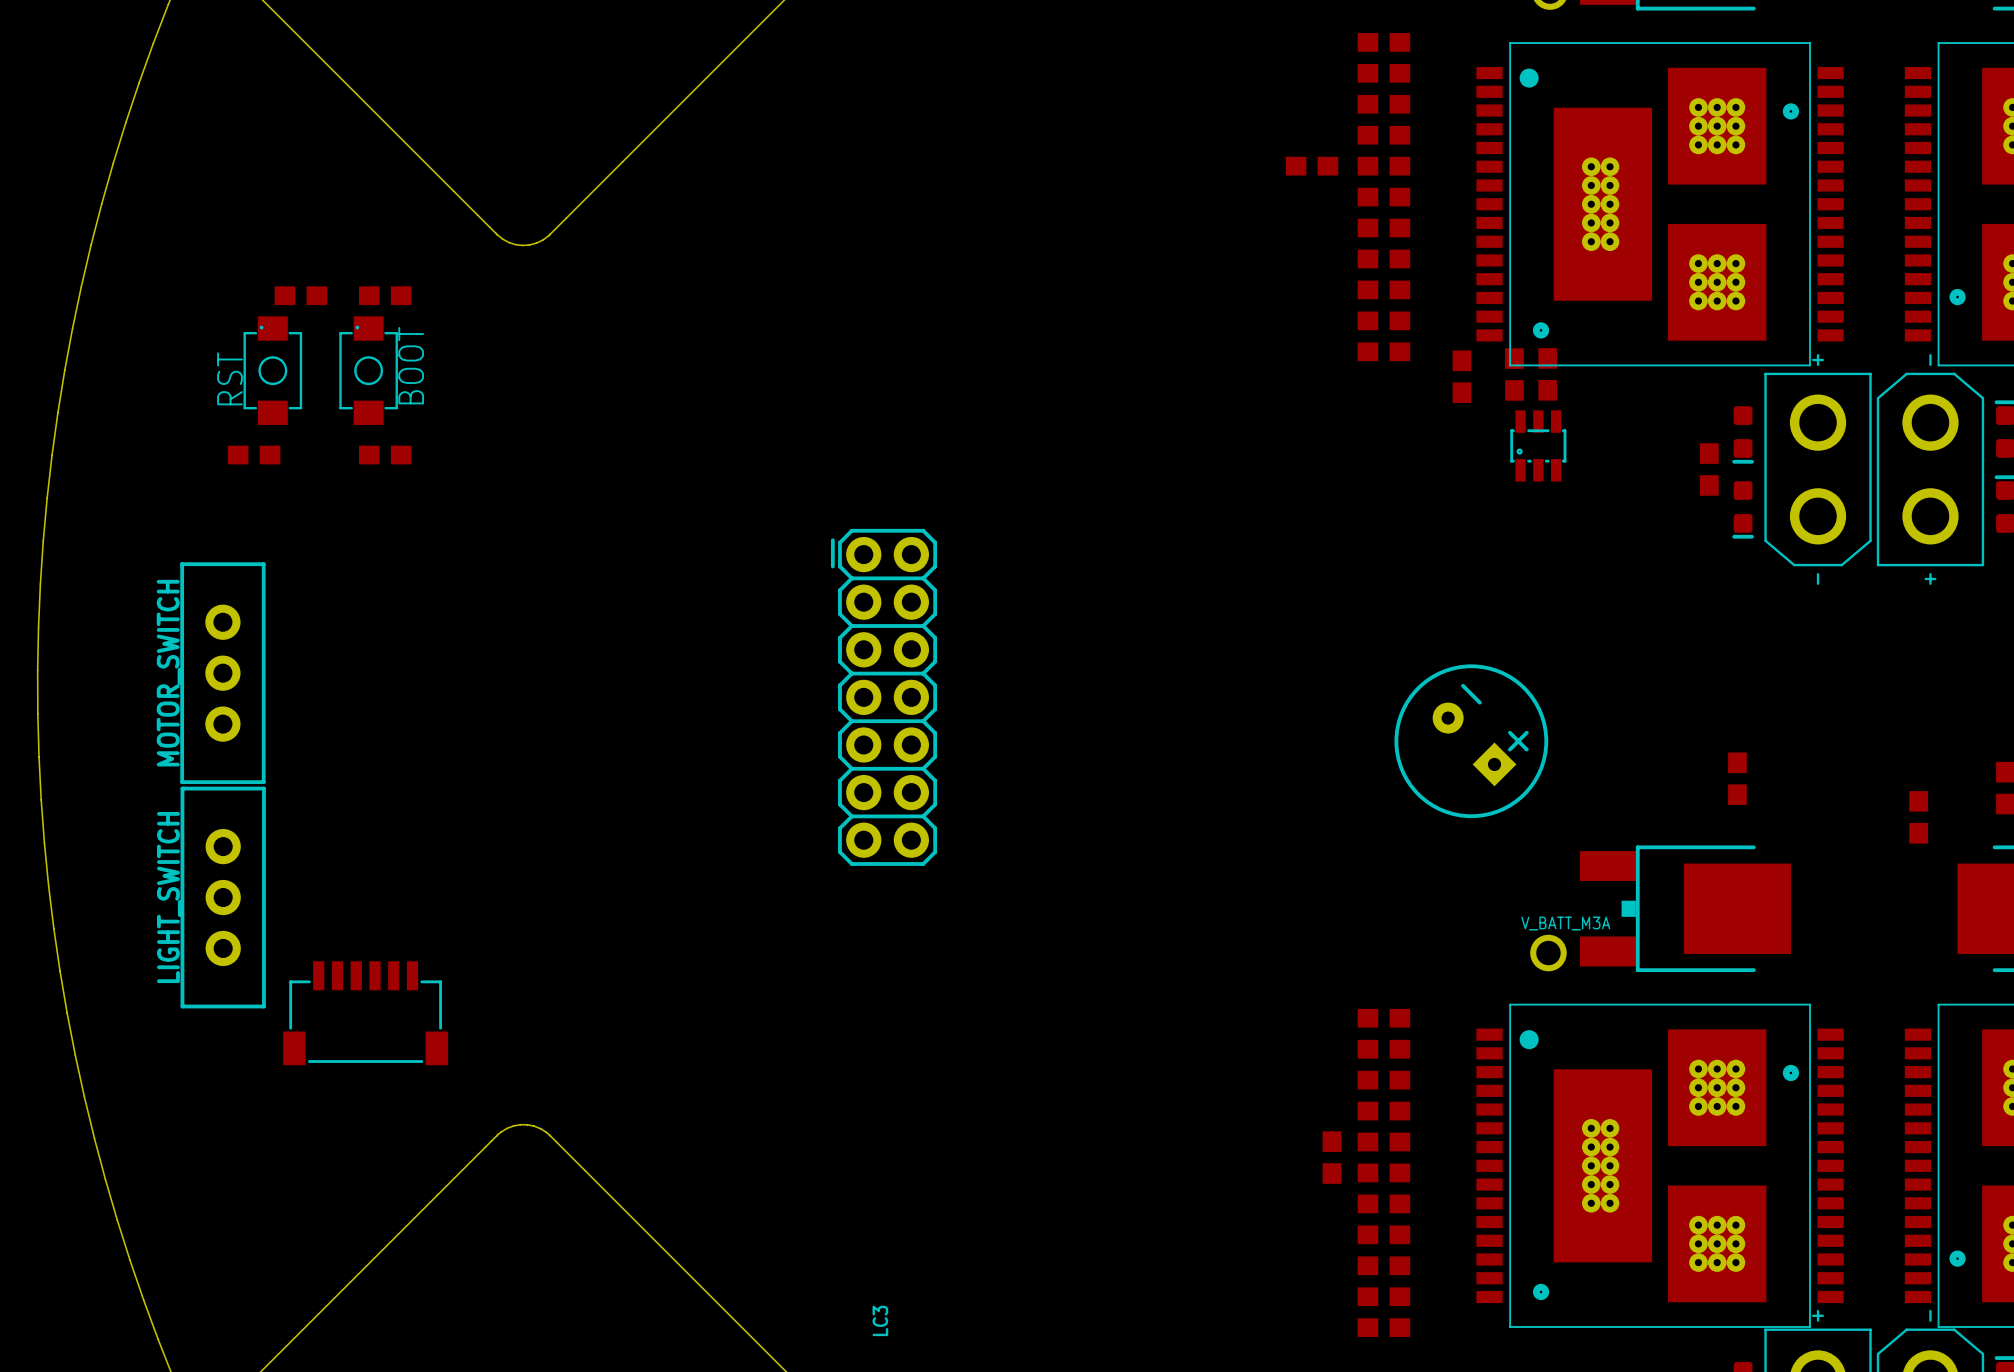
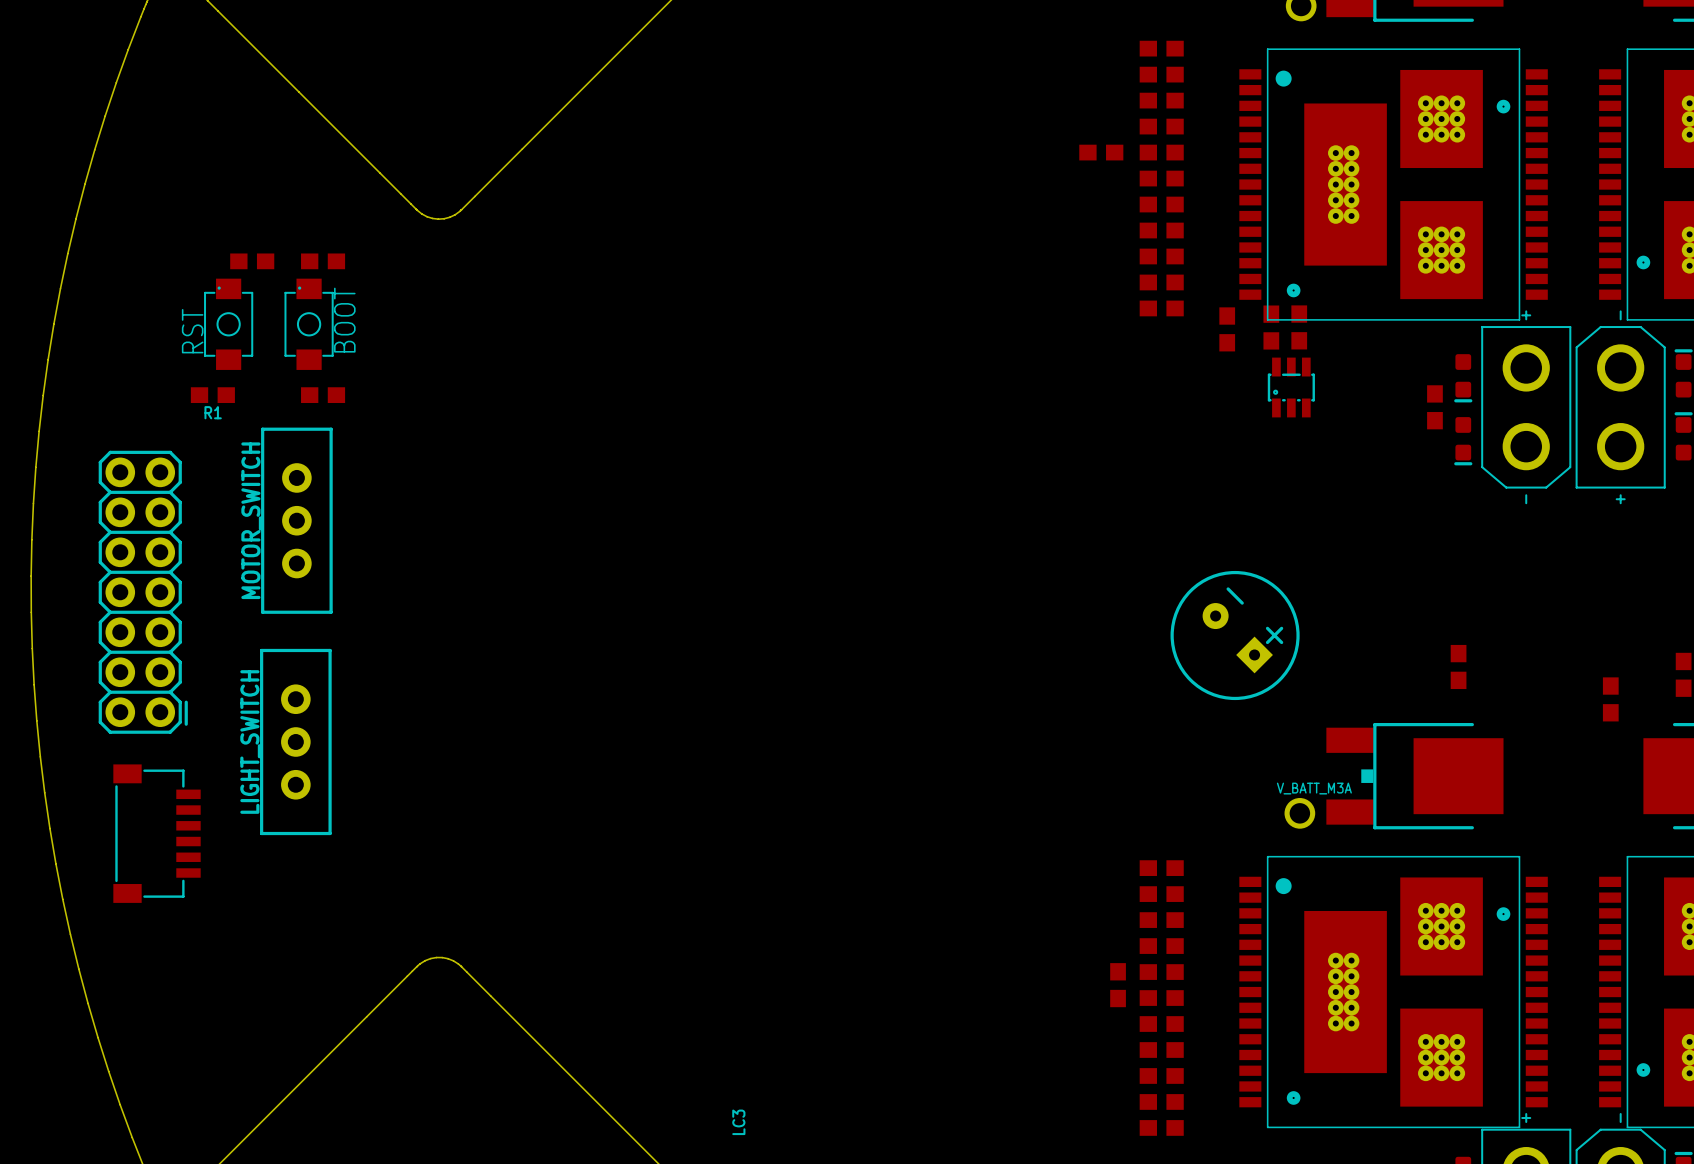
R1 name: none -> R1 (213, 412)
MOTOR_SWITCH position: (222, 673) -> (296, 520)
part: none -> (143, 592)
part: (884, 697) -> none
LIGHT_SWITCH position: (223, 897) -> (295, 741)
part rotation: 0° (365, 1013) -> 90° clockwise (157, 833)
part position: (365, 1013) -> (157, 833)

